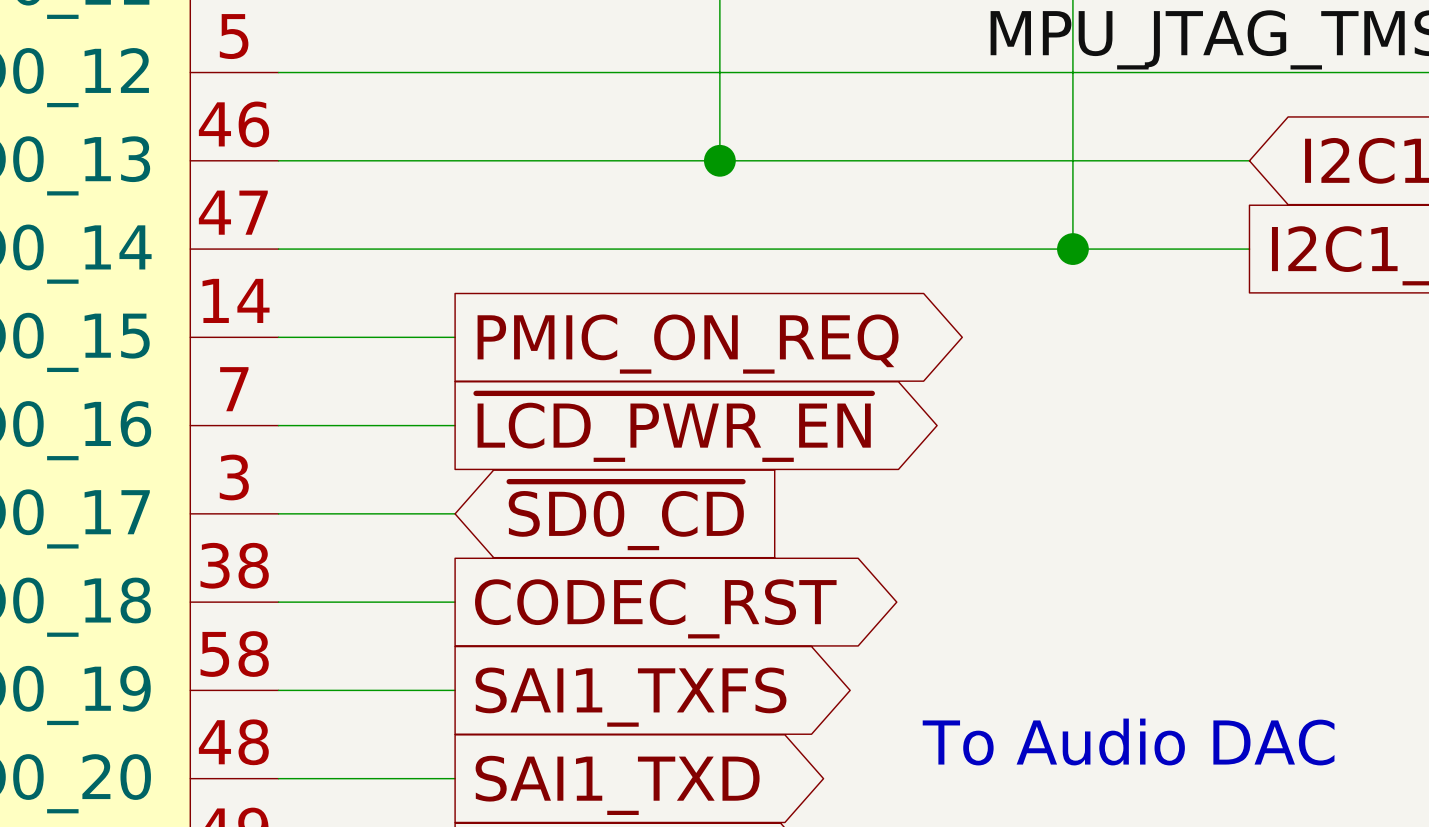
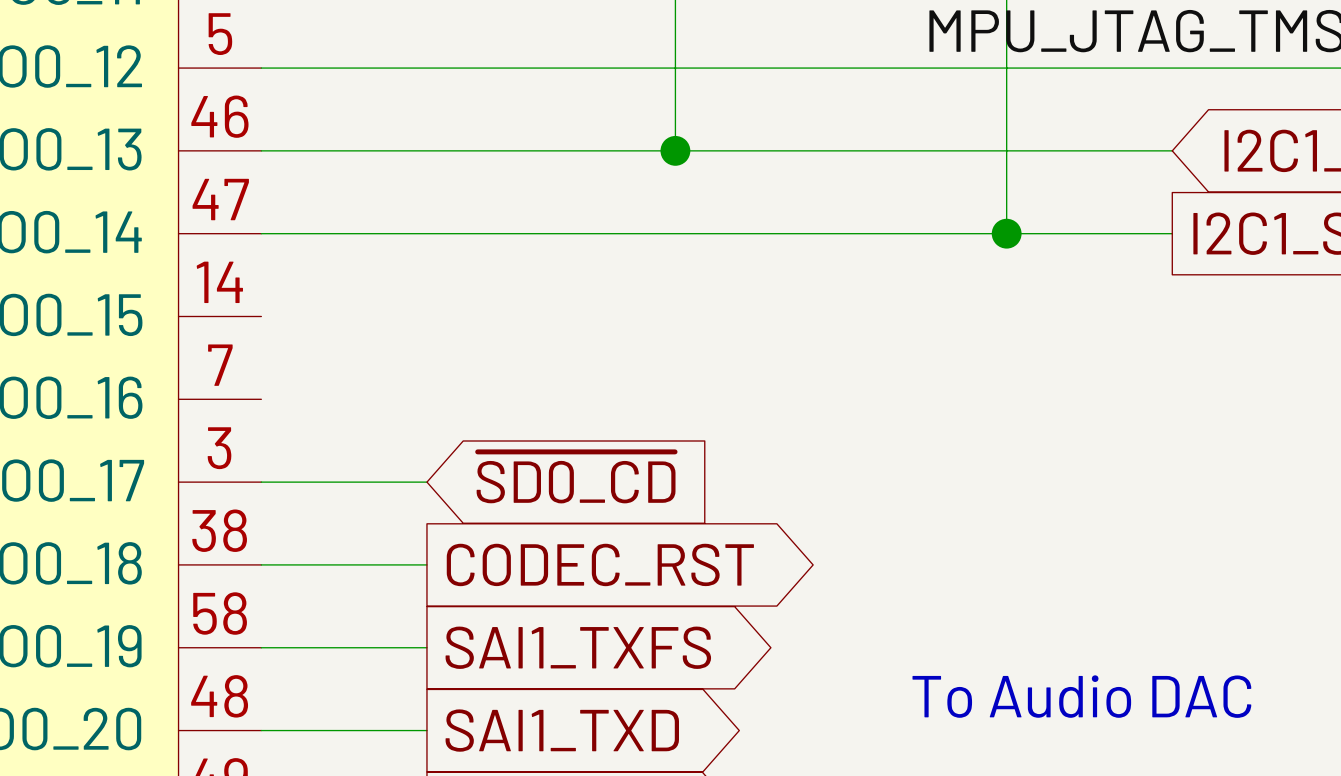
wire: (278, 337) (455, 337) -> none
global label: PMIC_ON_REQ (688, 344) -> none
wire: (278, 425) (455, 425) -> none
global label: ~{LCD_PWR_EN} (674, 427) -> none

